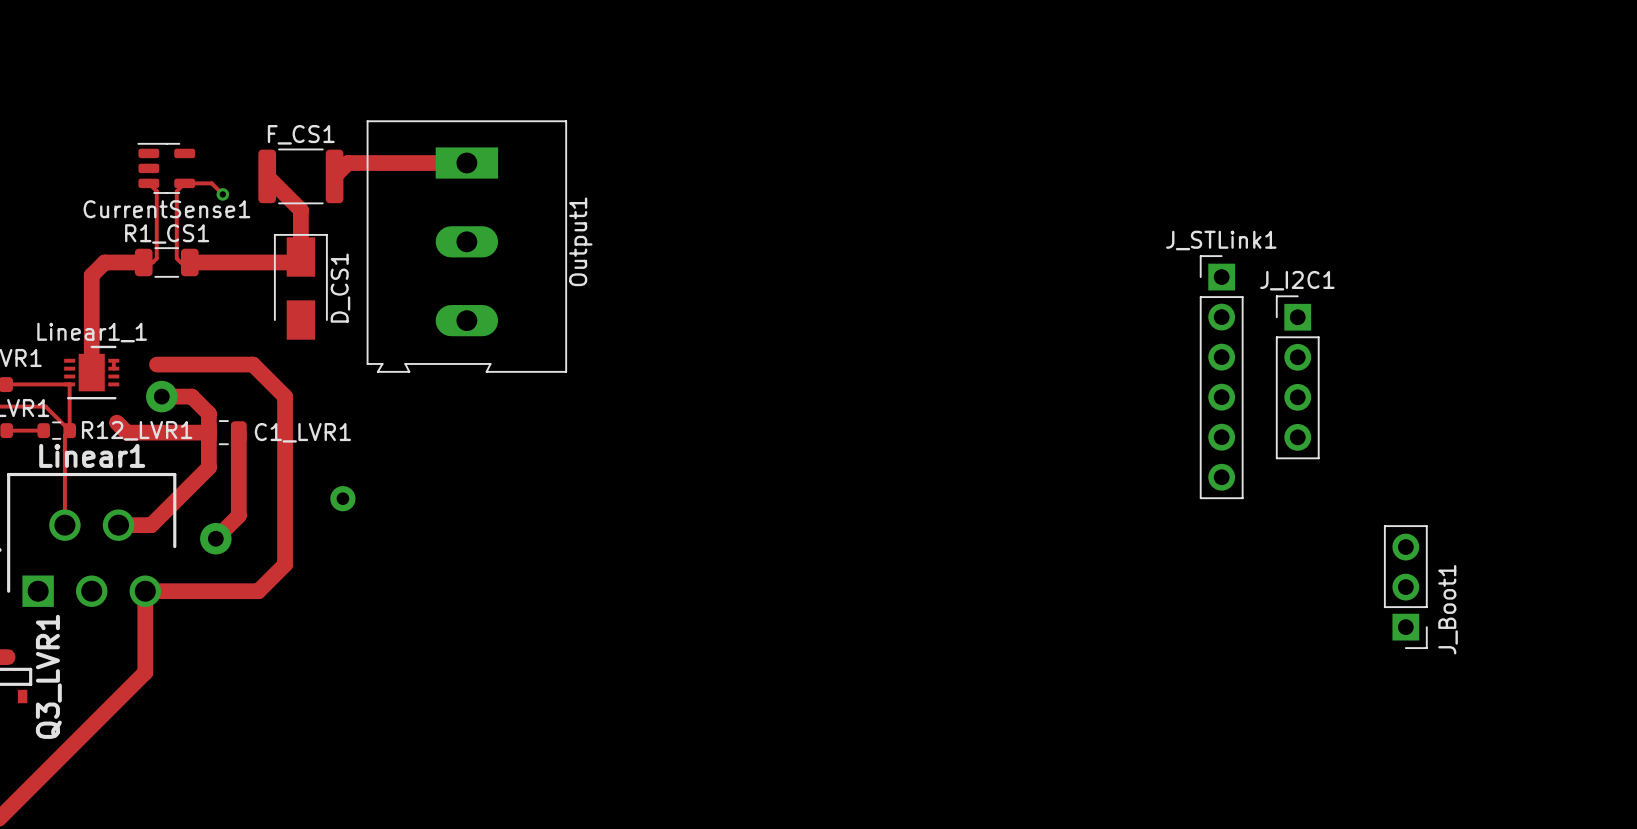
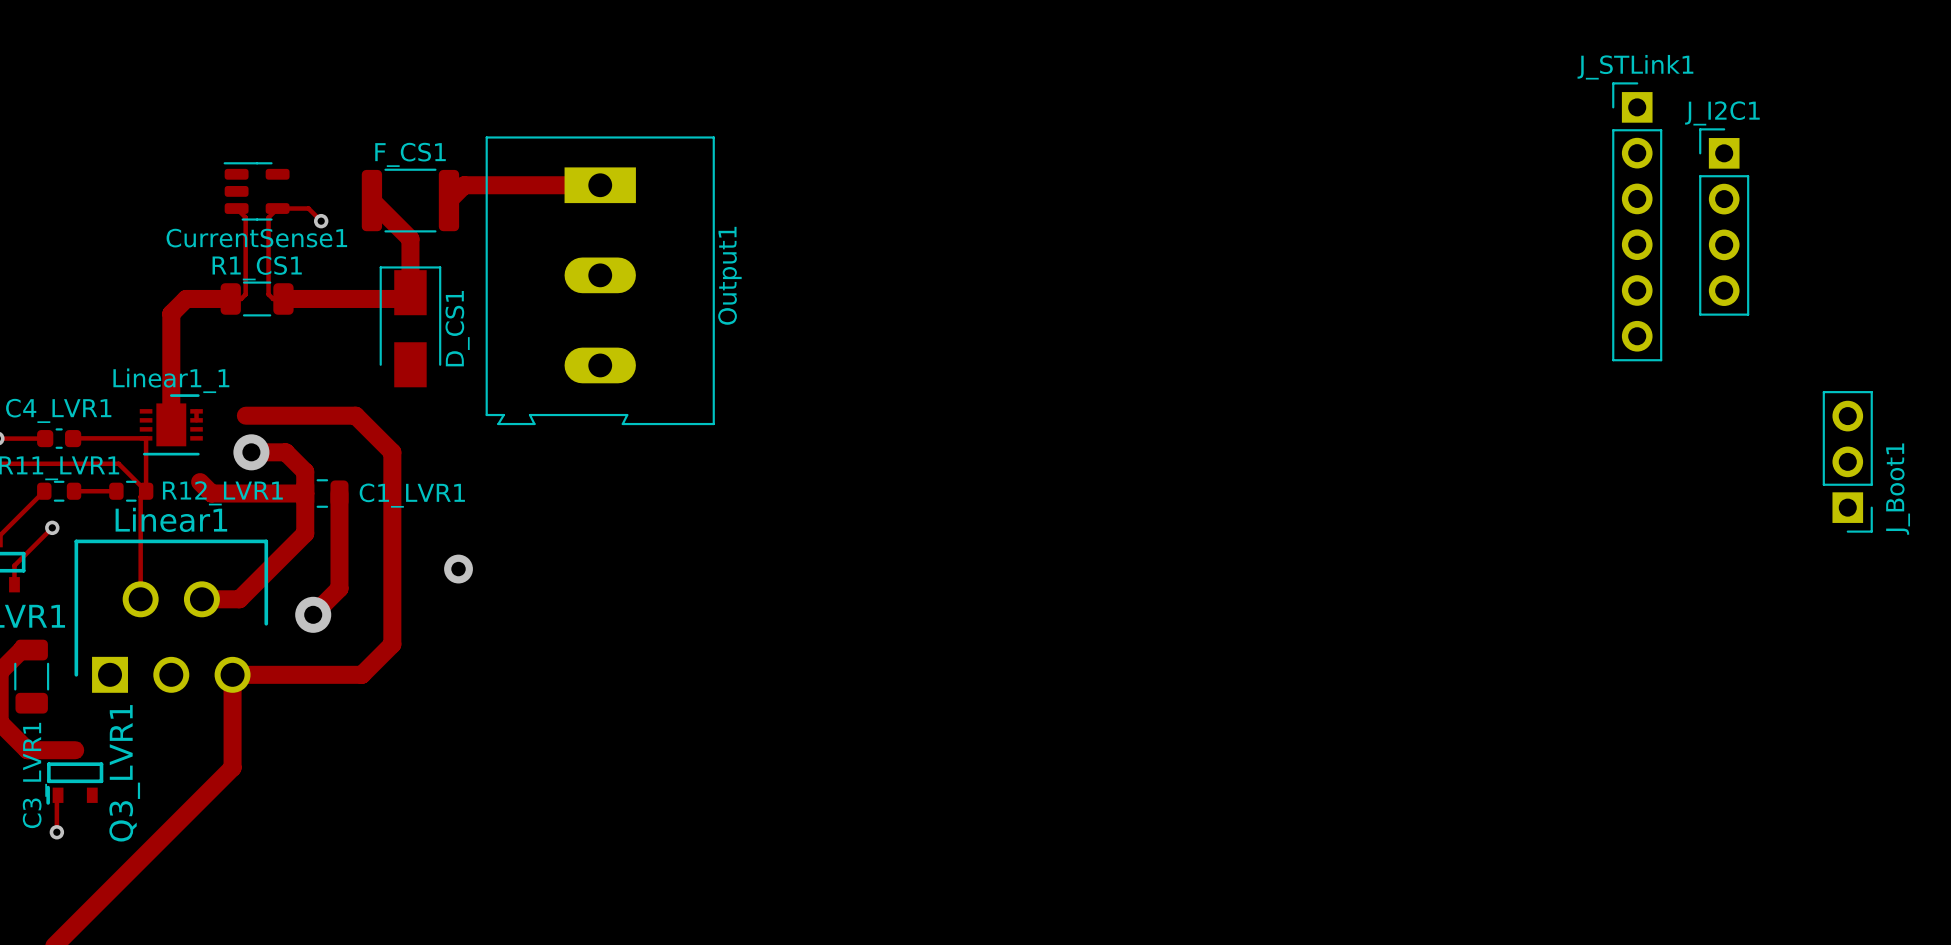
J_STLink1 position: (1221, 377) -> (1637, 221)
J_I2C1 position: (1297, 377) -> (1724, 221)
J_Boot1 position: (1405, 587) -> (1847, 461)

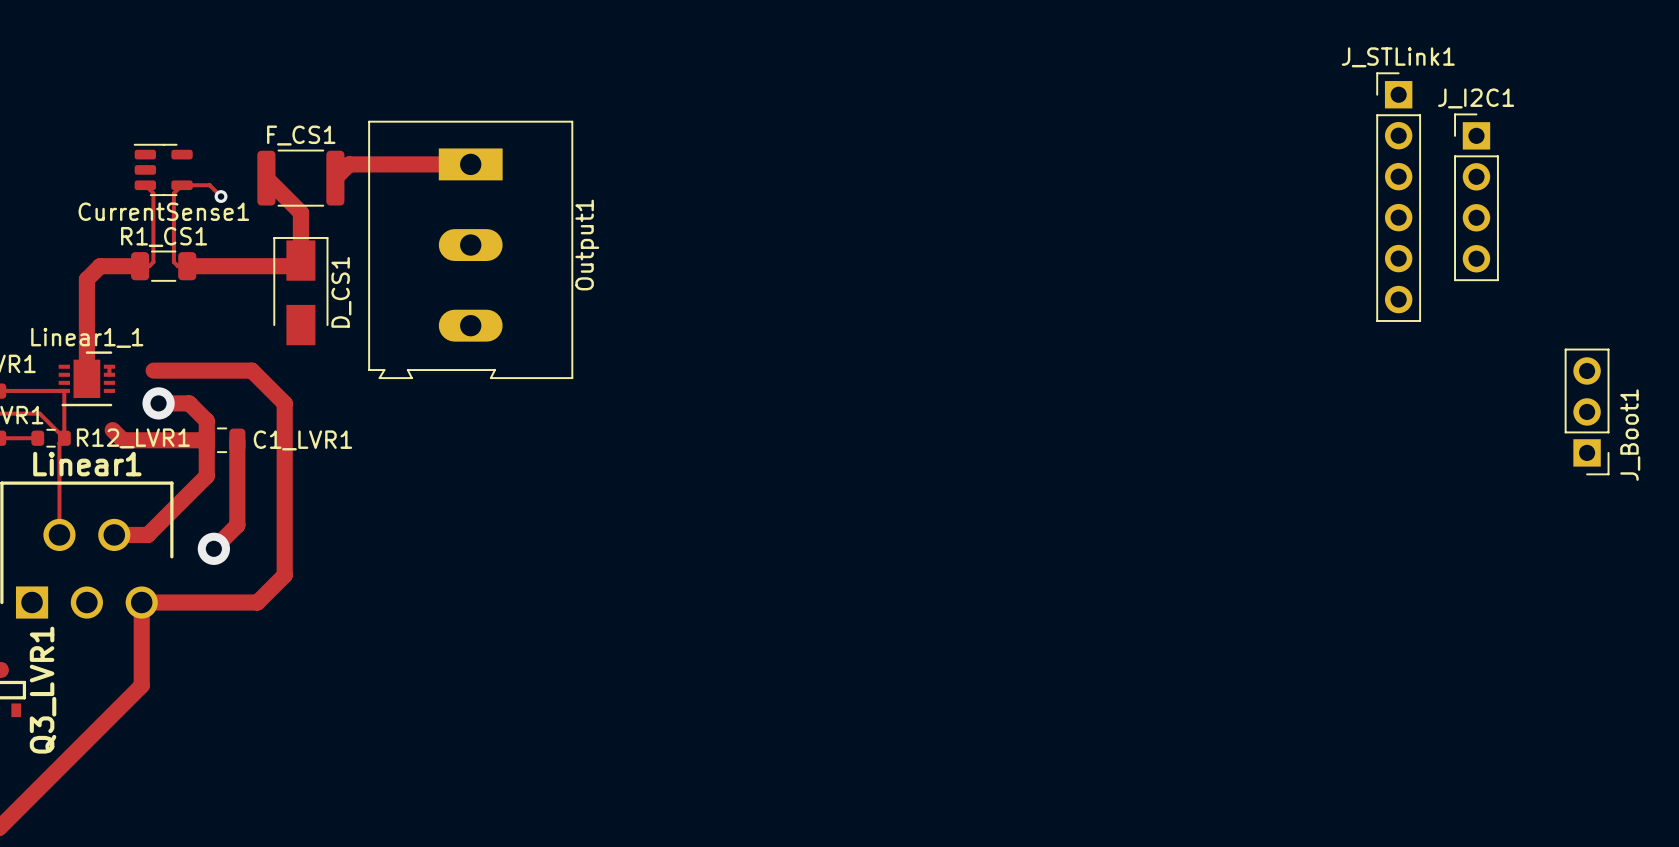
via: (458, 569) -> none

